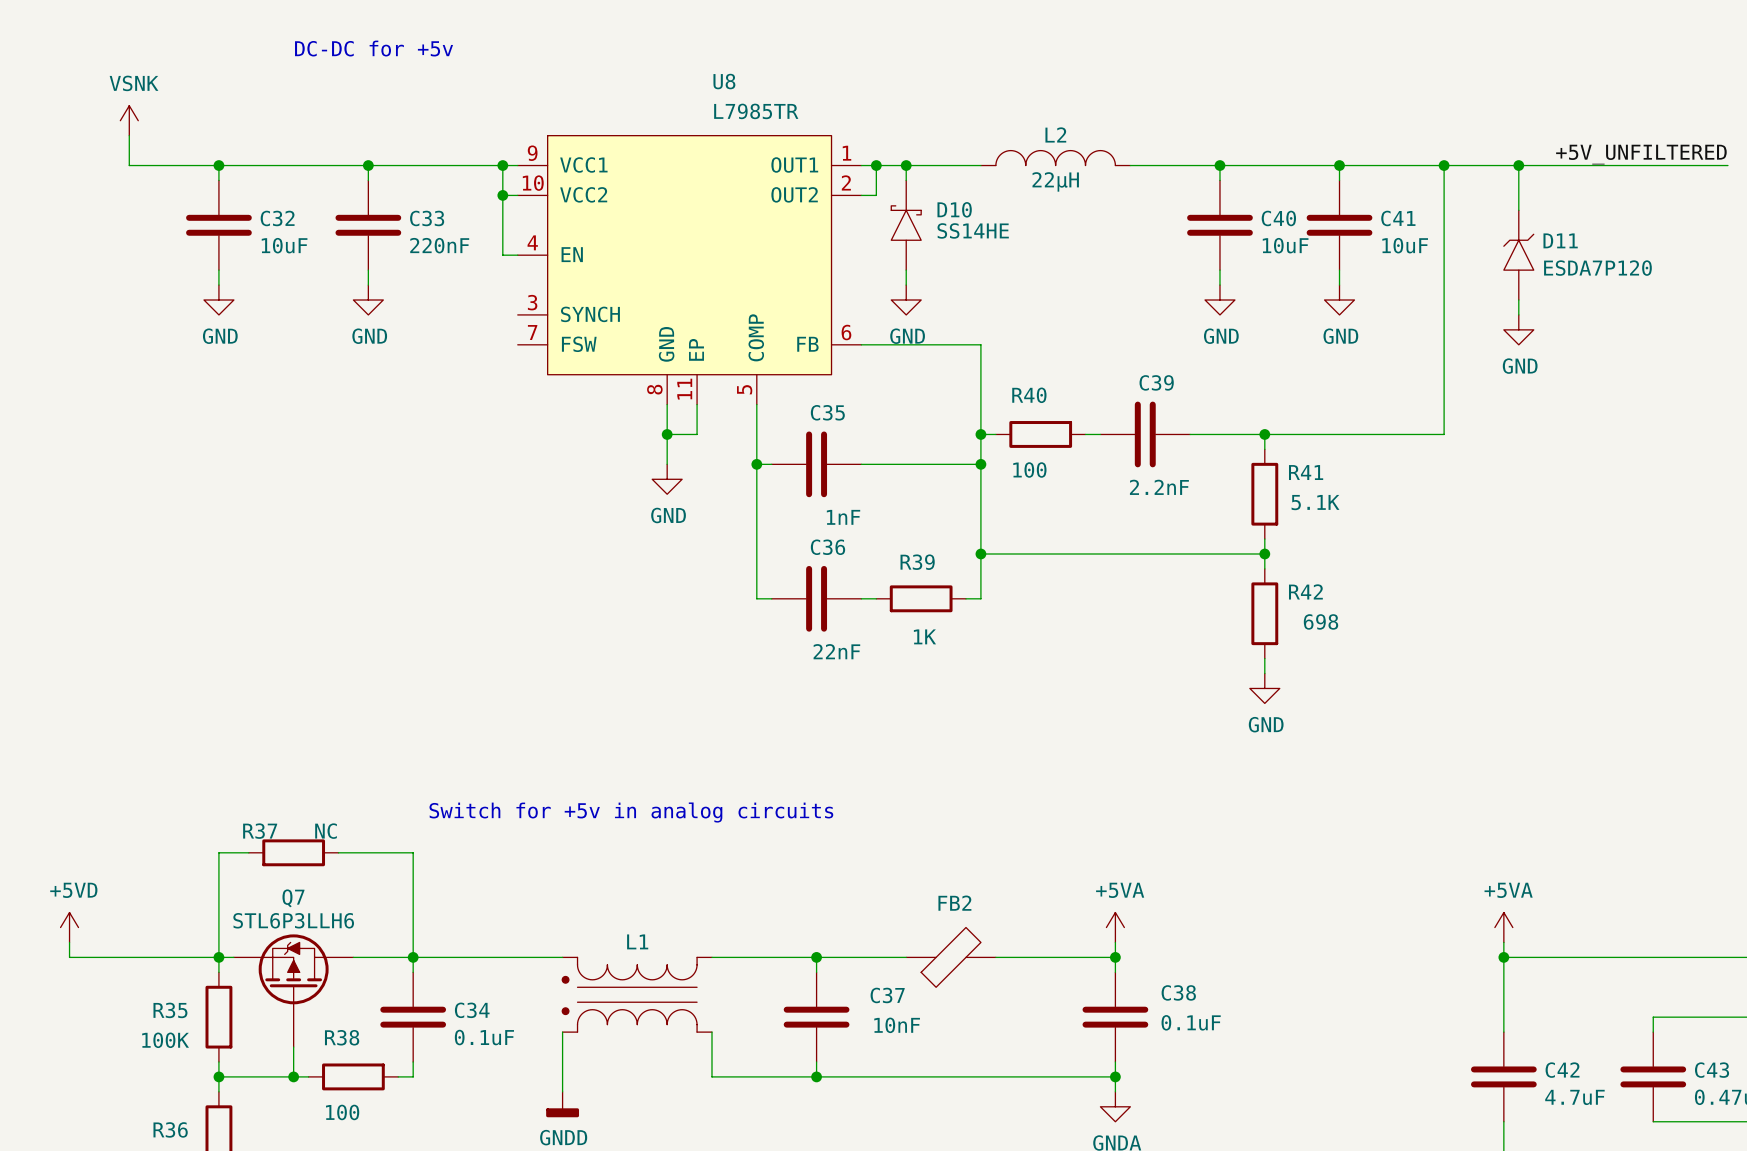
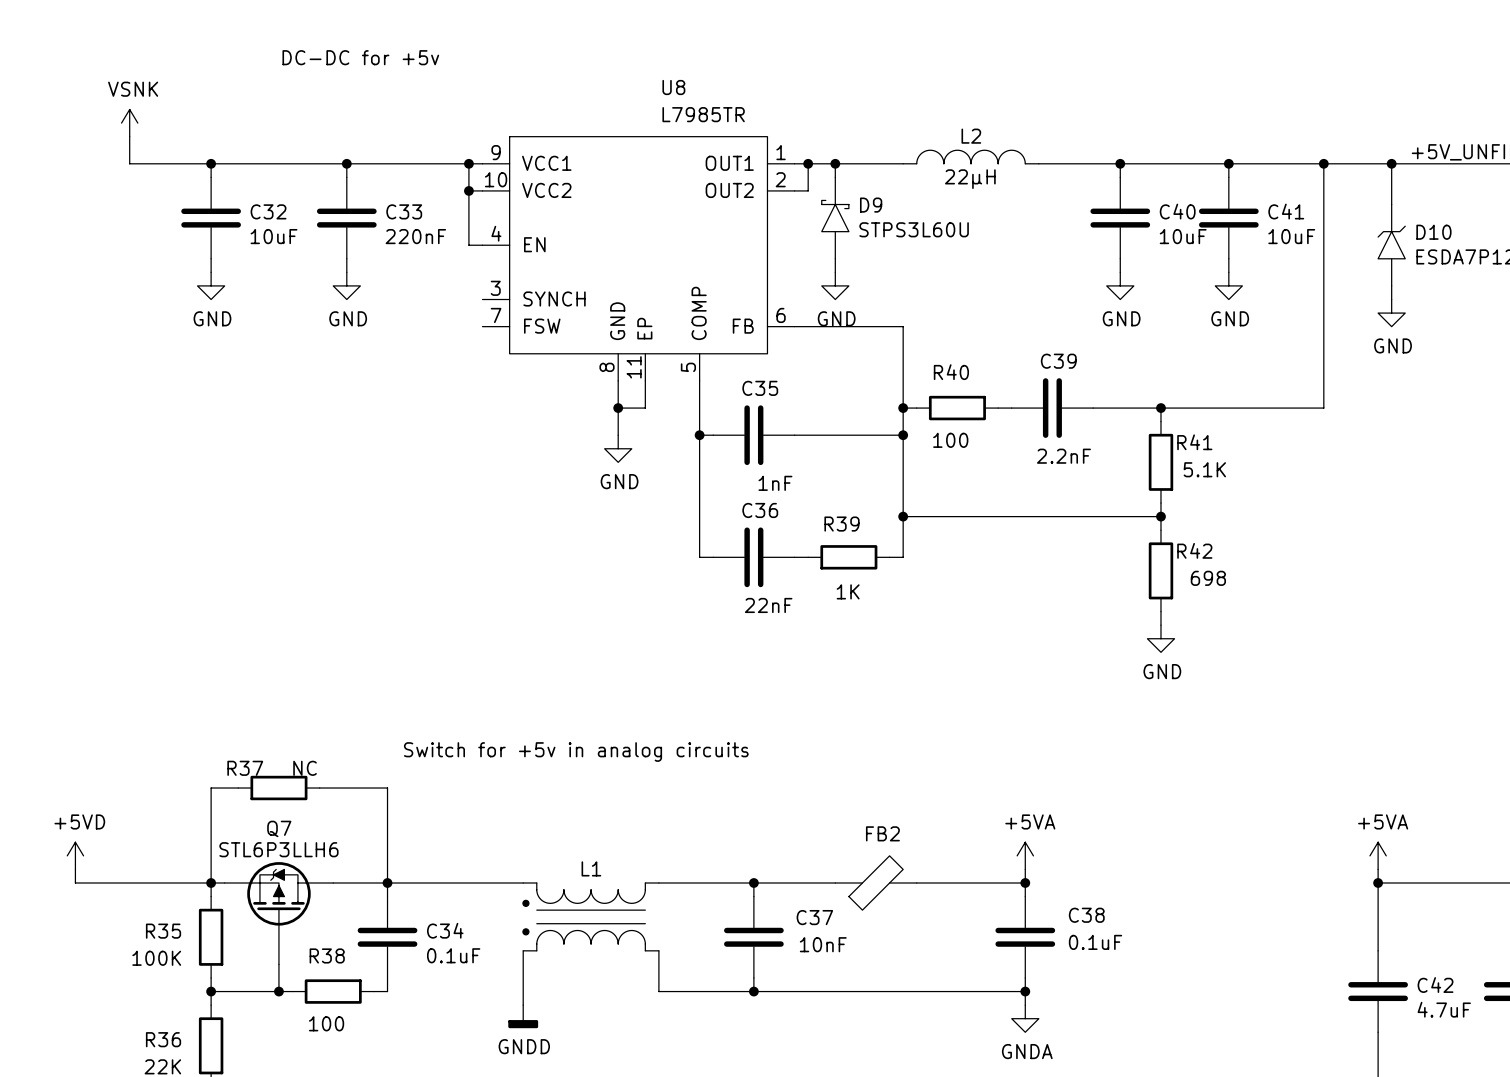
D10 name: D10 (954, 209) -> D9 (871, 205)
D10 value: SS14HE (973, 230) -> STPS3L60U (914, 229)
D11 name: D11 (1560, 240) -> D10 (1433, 232)

